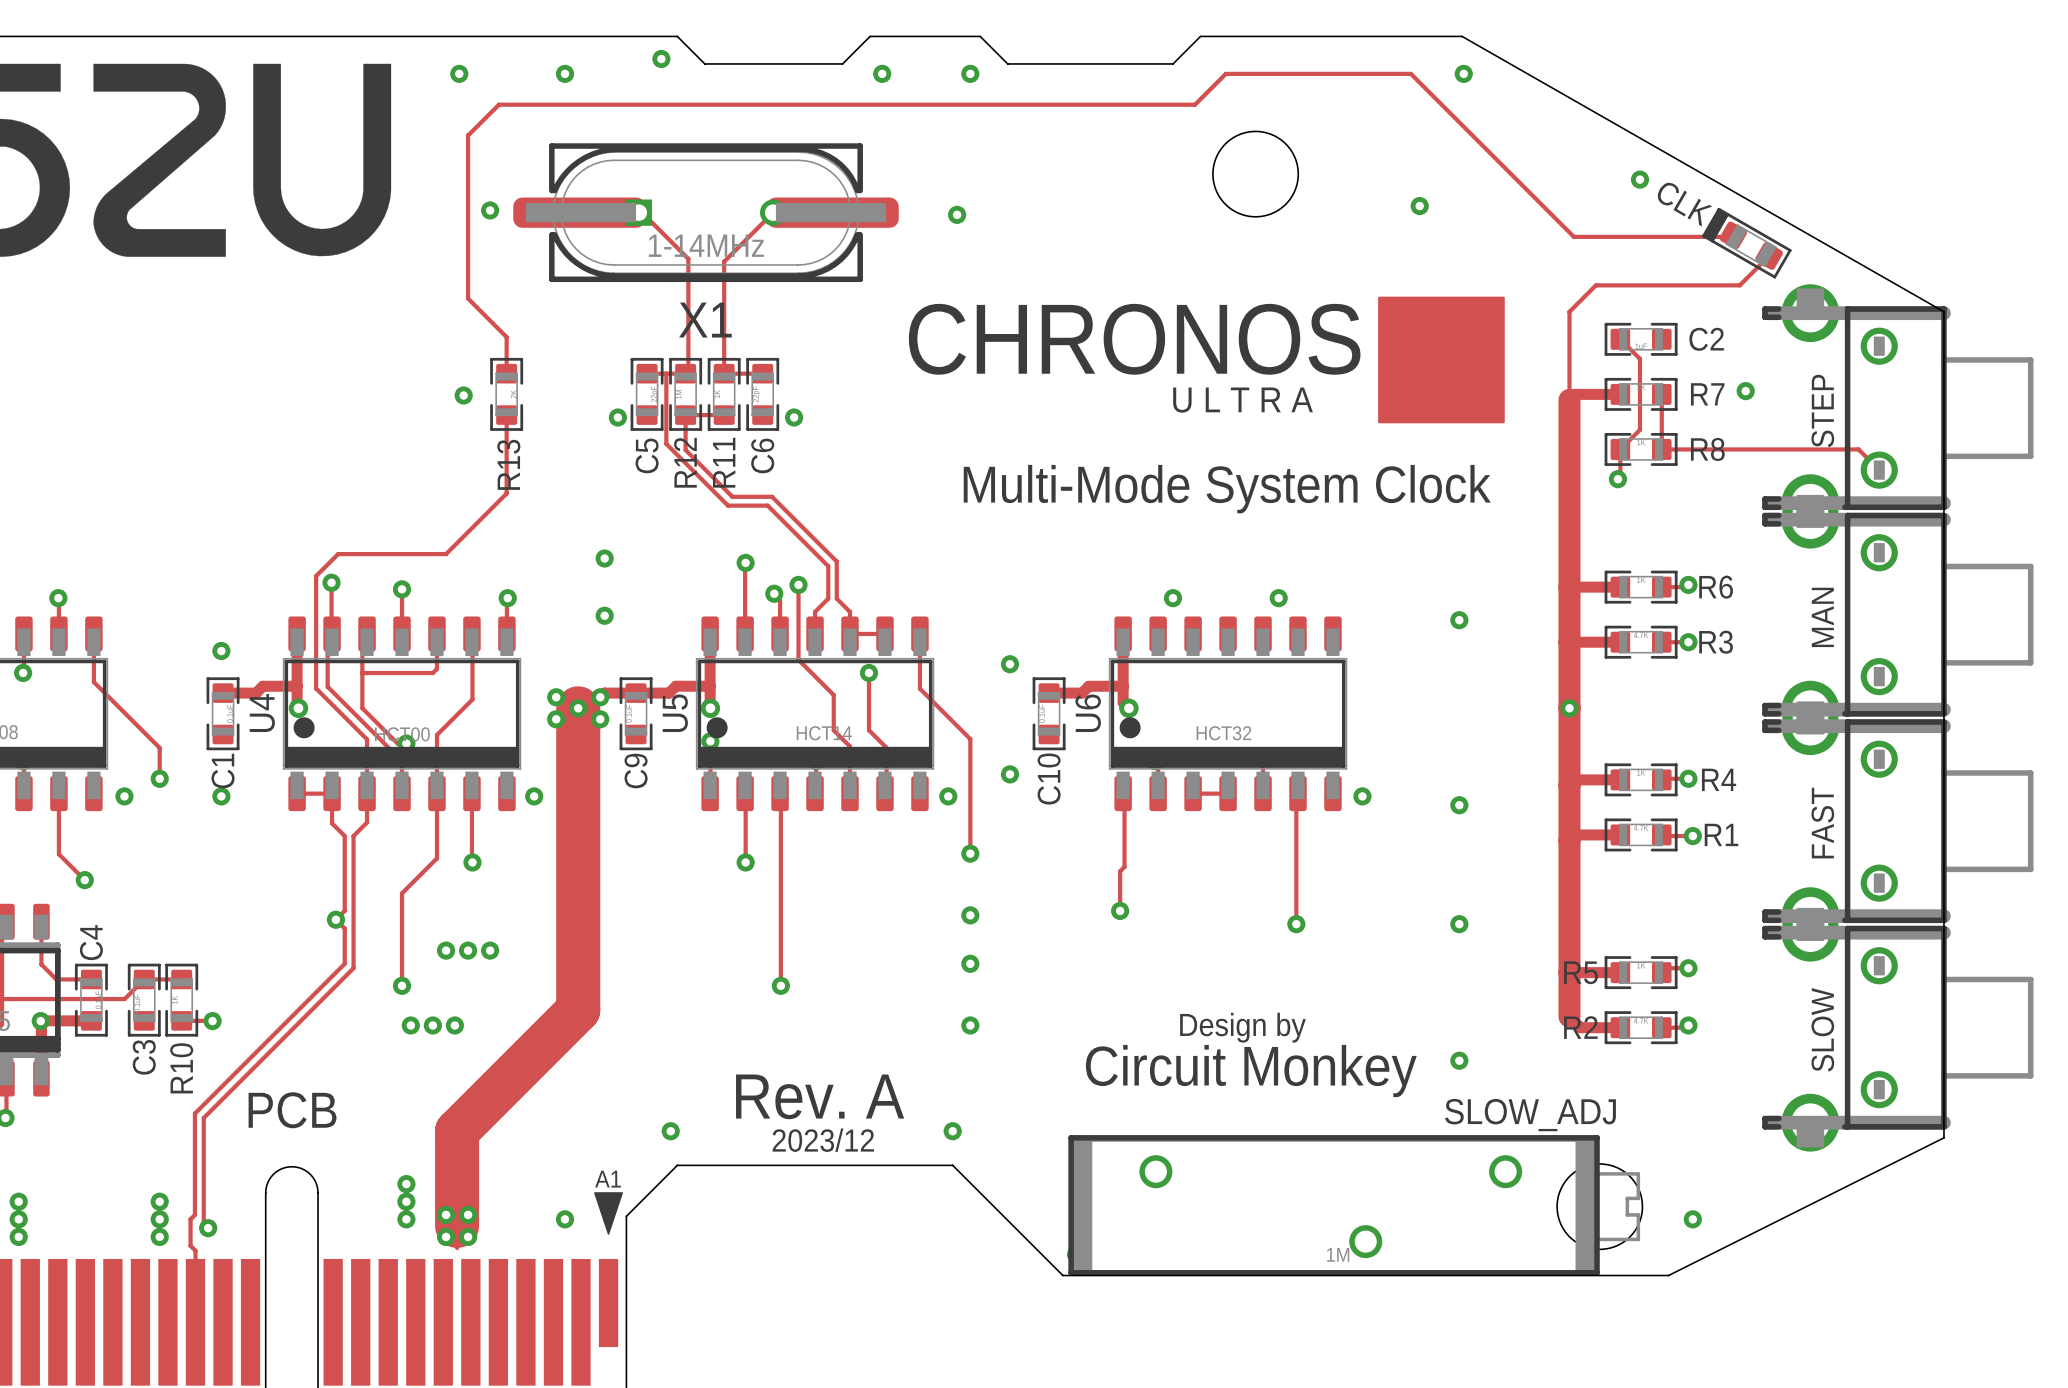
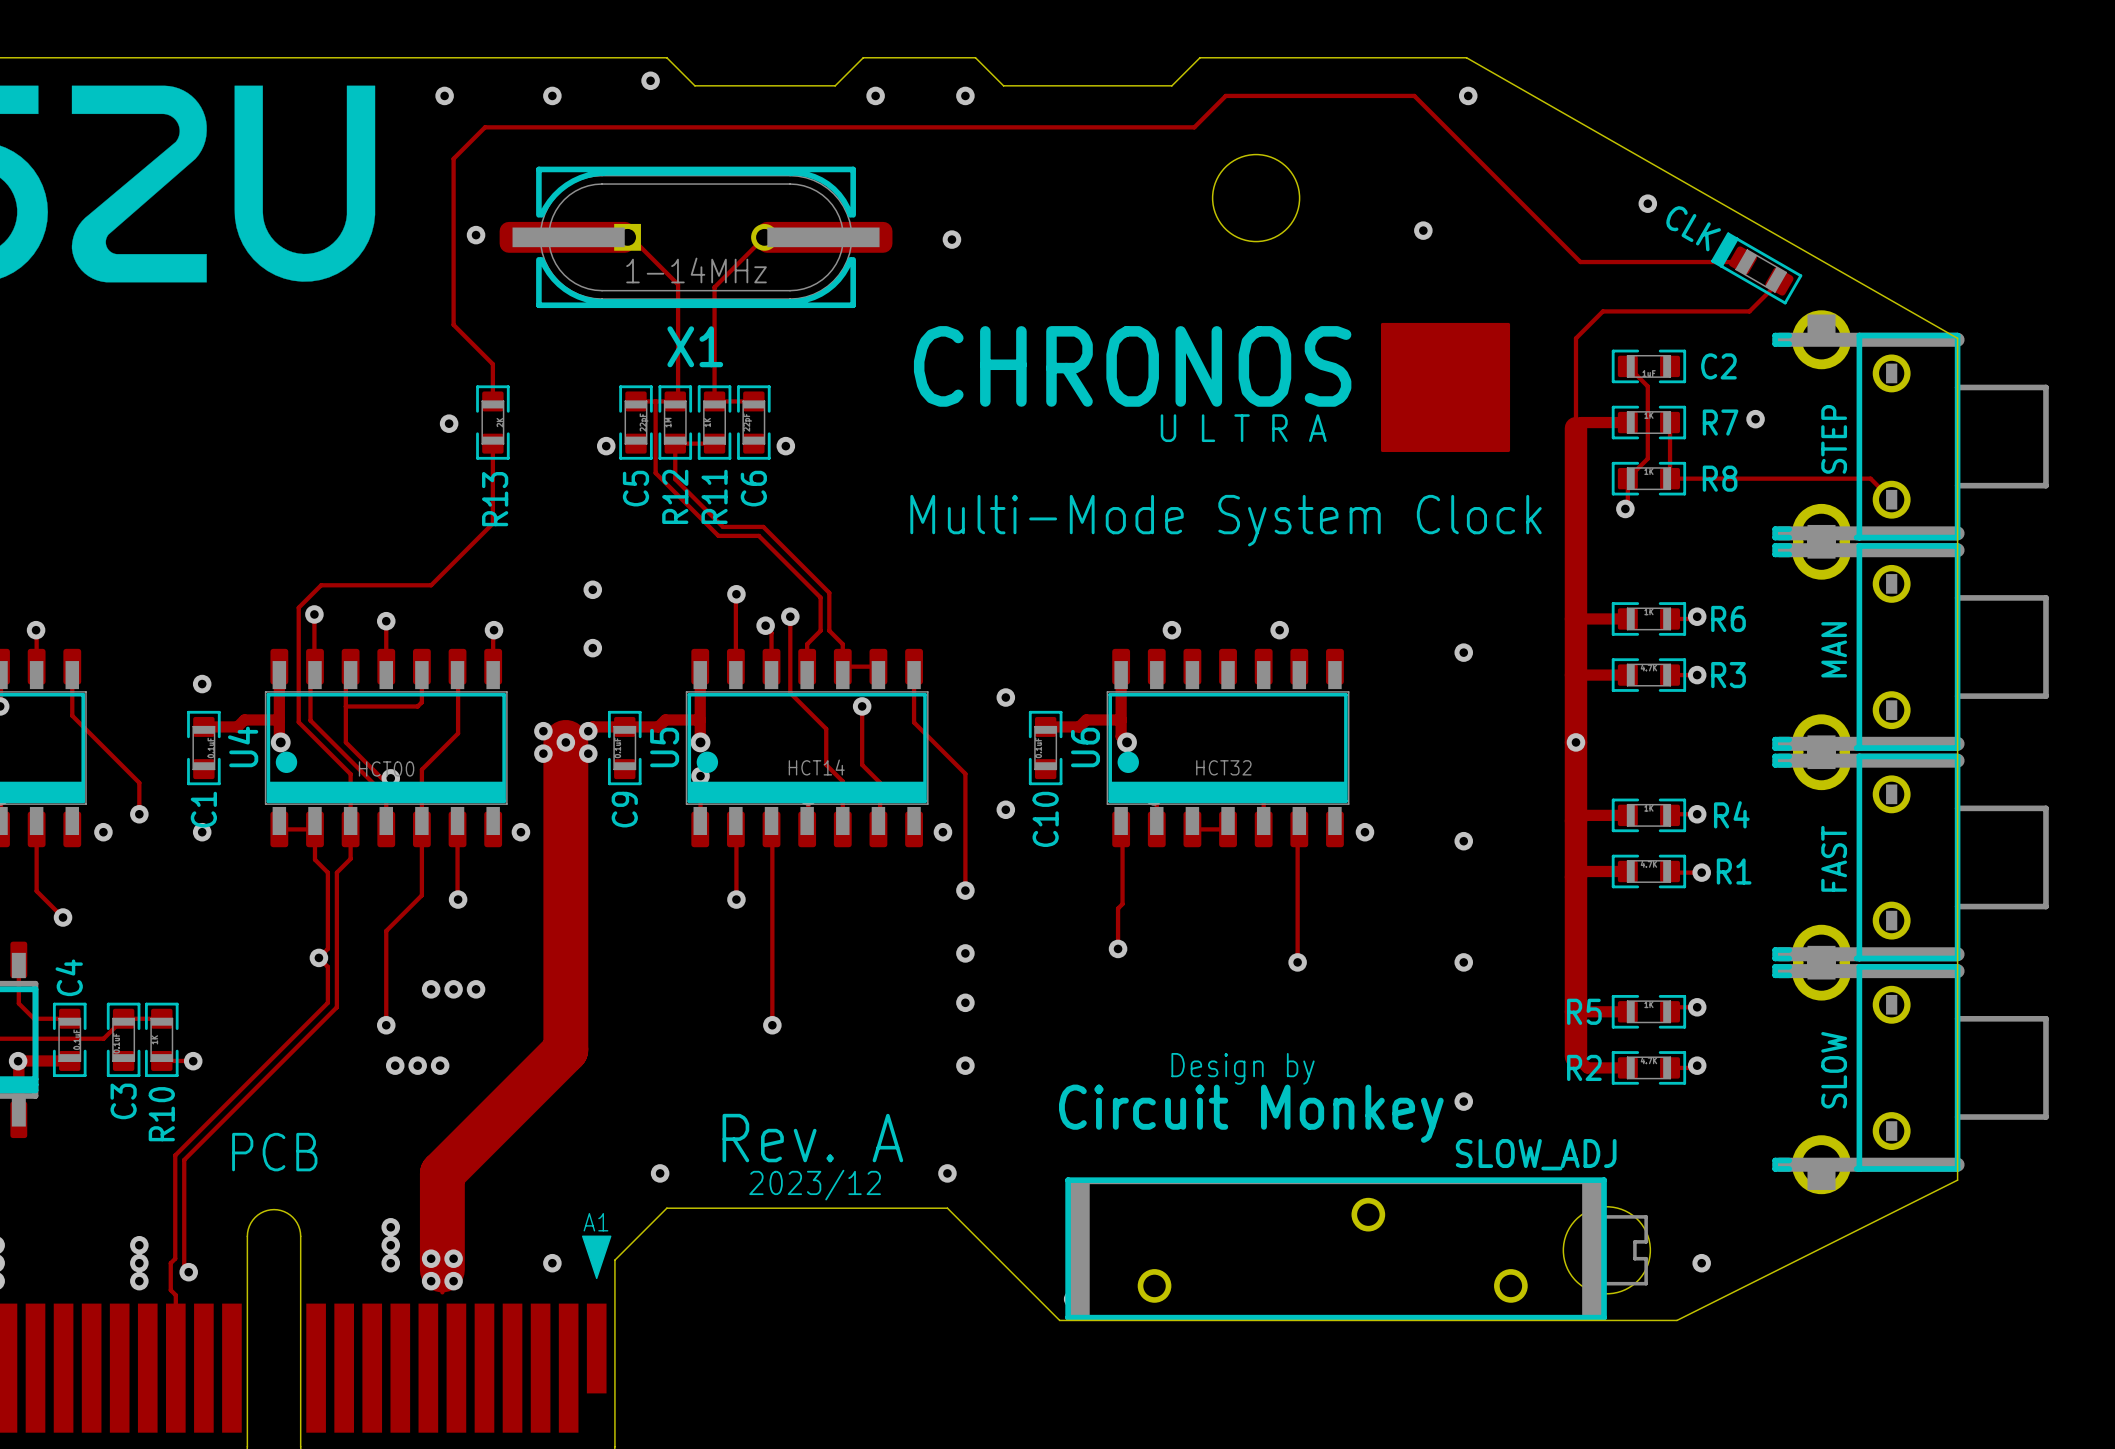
SLOW_ADJ footprint: [1068, 1135, 1641, 1276] -> [1065, 1177, 1648, 1321]
SLOW_ADJ value: 1M (1338, 1254) -> none

